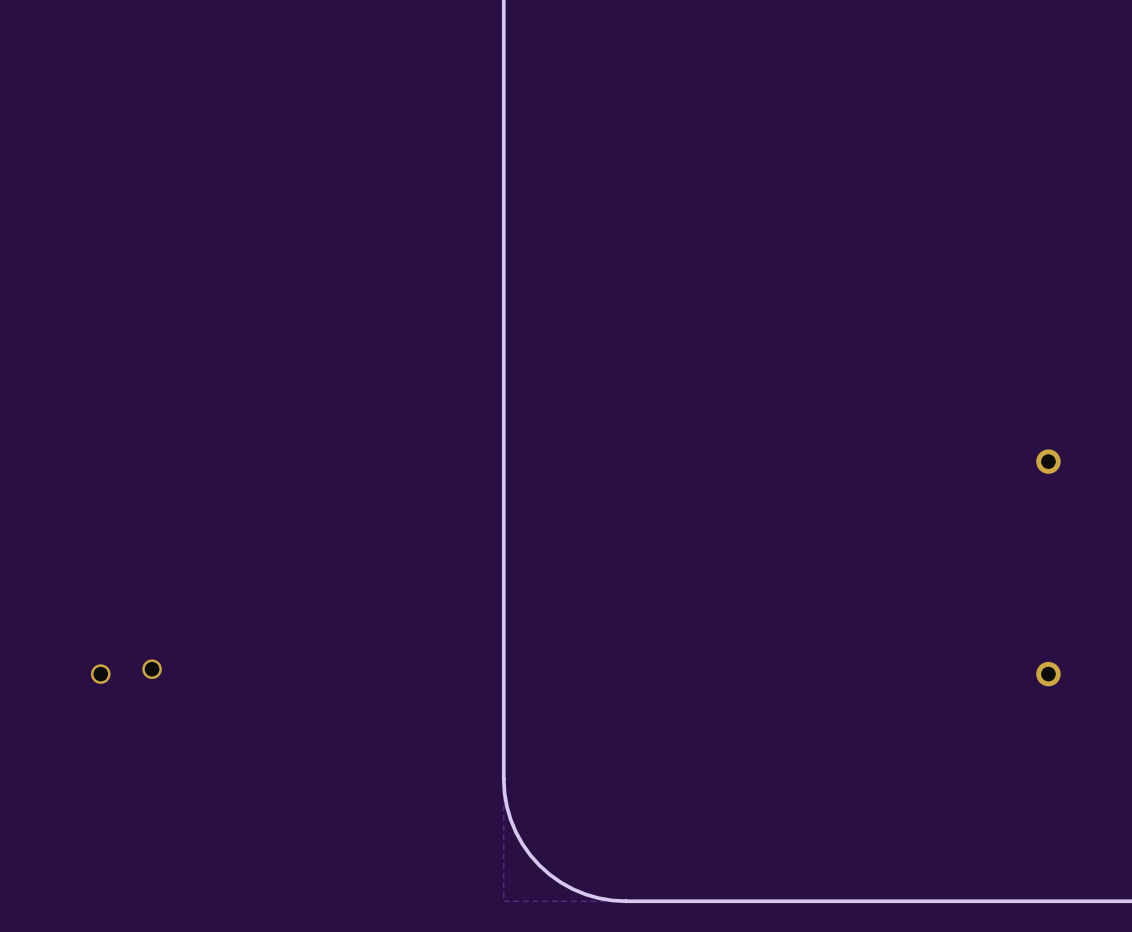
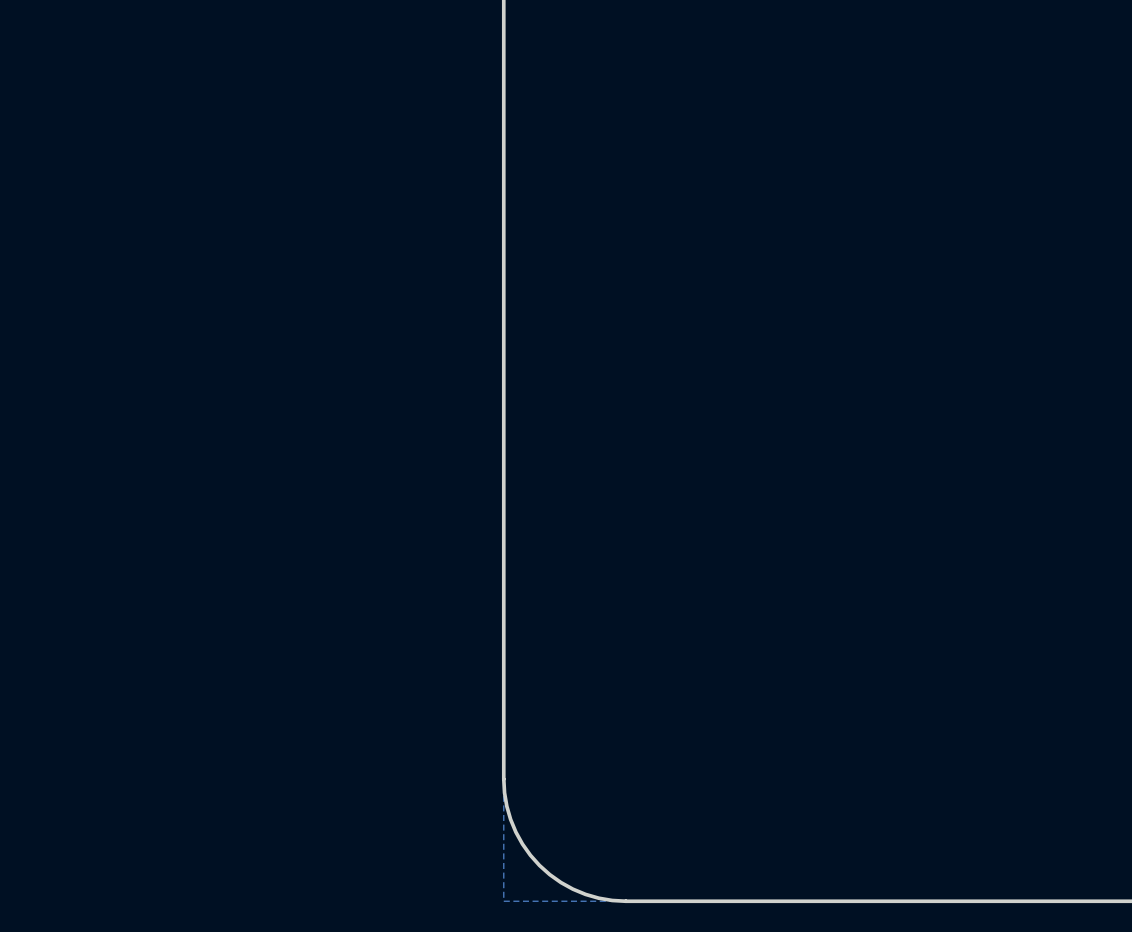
via: (1048, 461) -> none
via: (152, 669) -> none
via: (100, 674) -> none
via: (1048, 674) -> none

